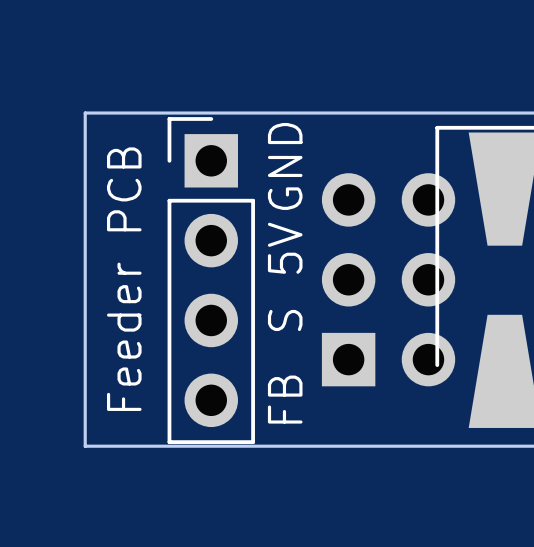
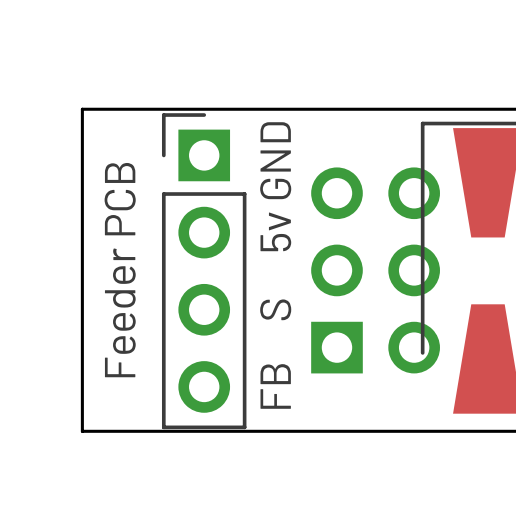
text: 5V (285, 248) -> 5v (275, 231)

